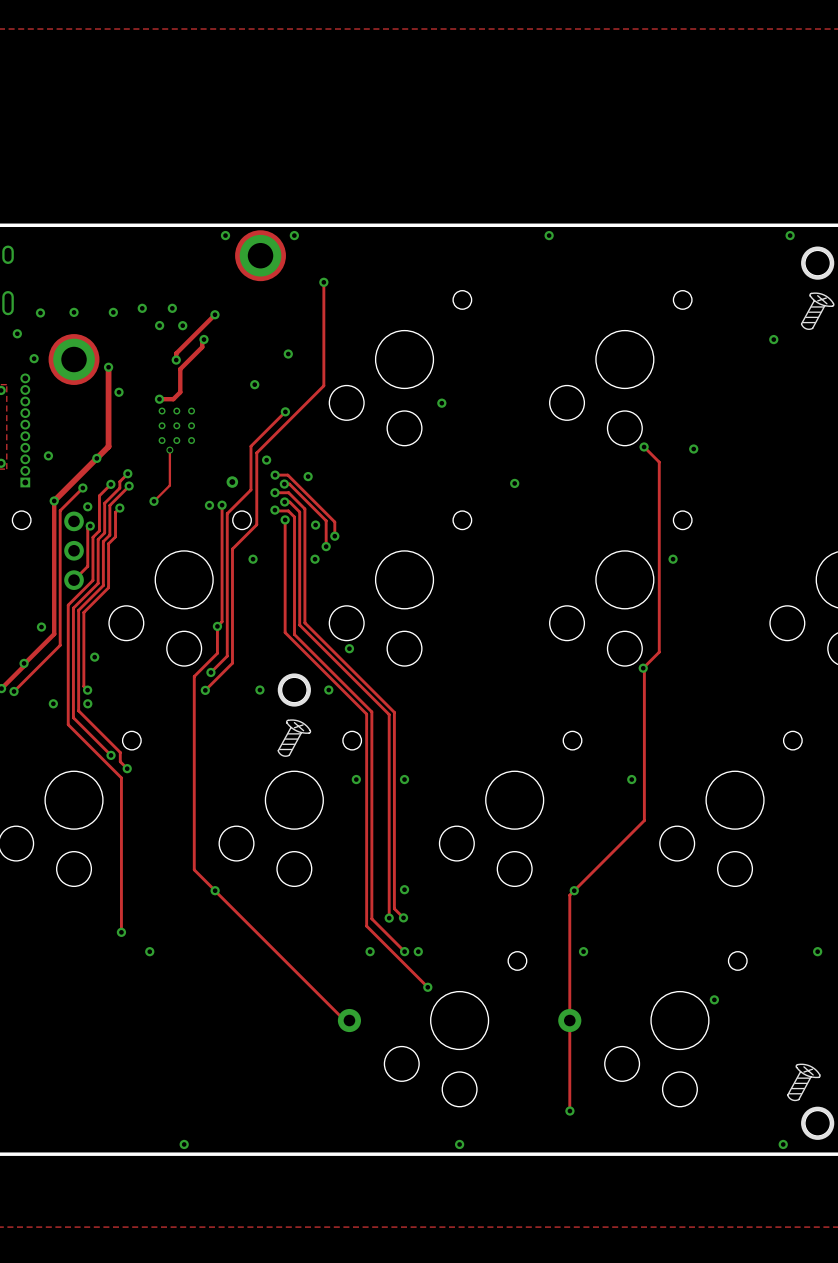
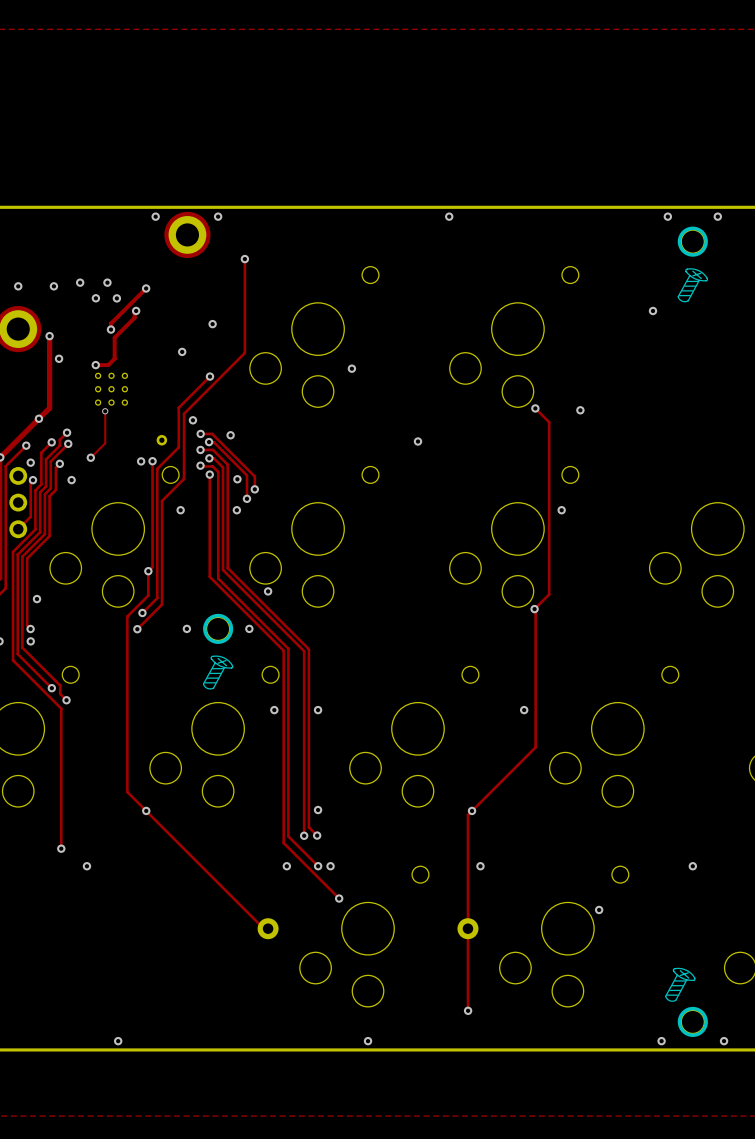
via: none -> (71, 480)

